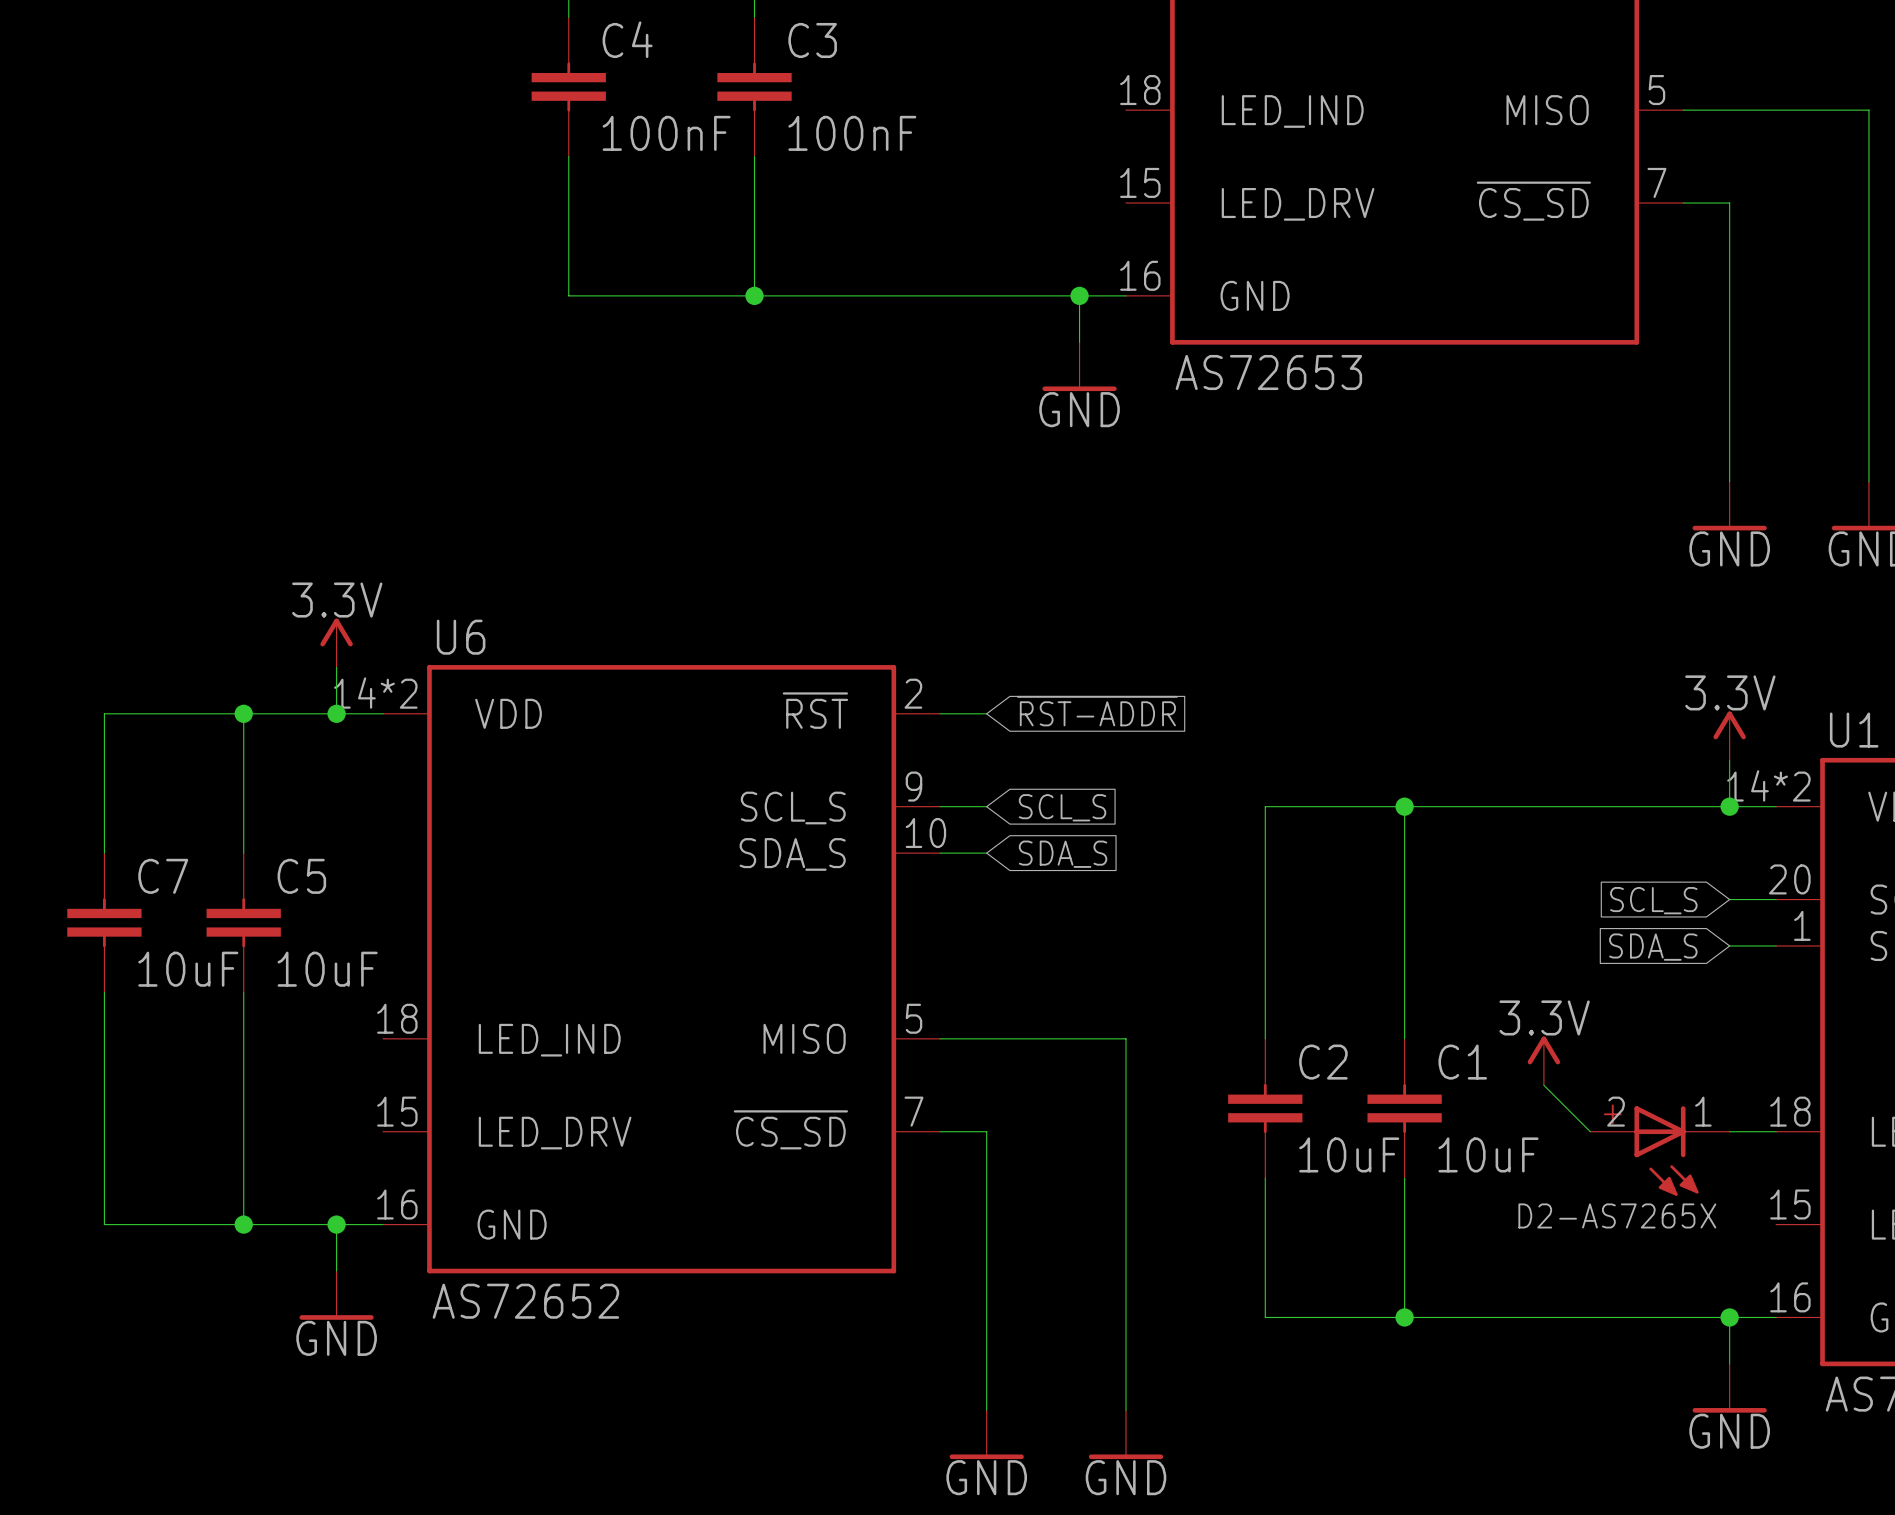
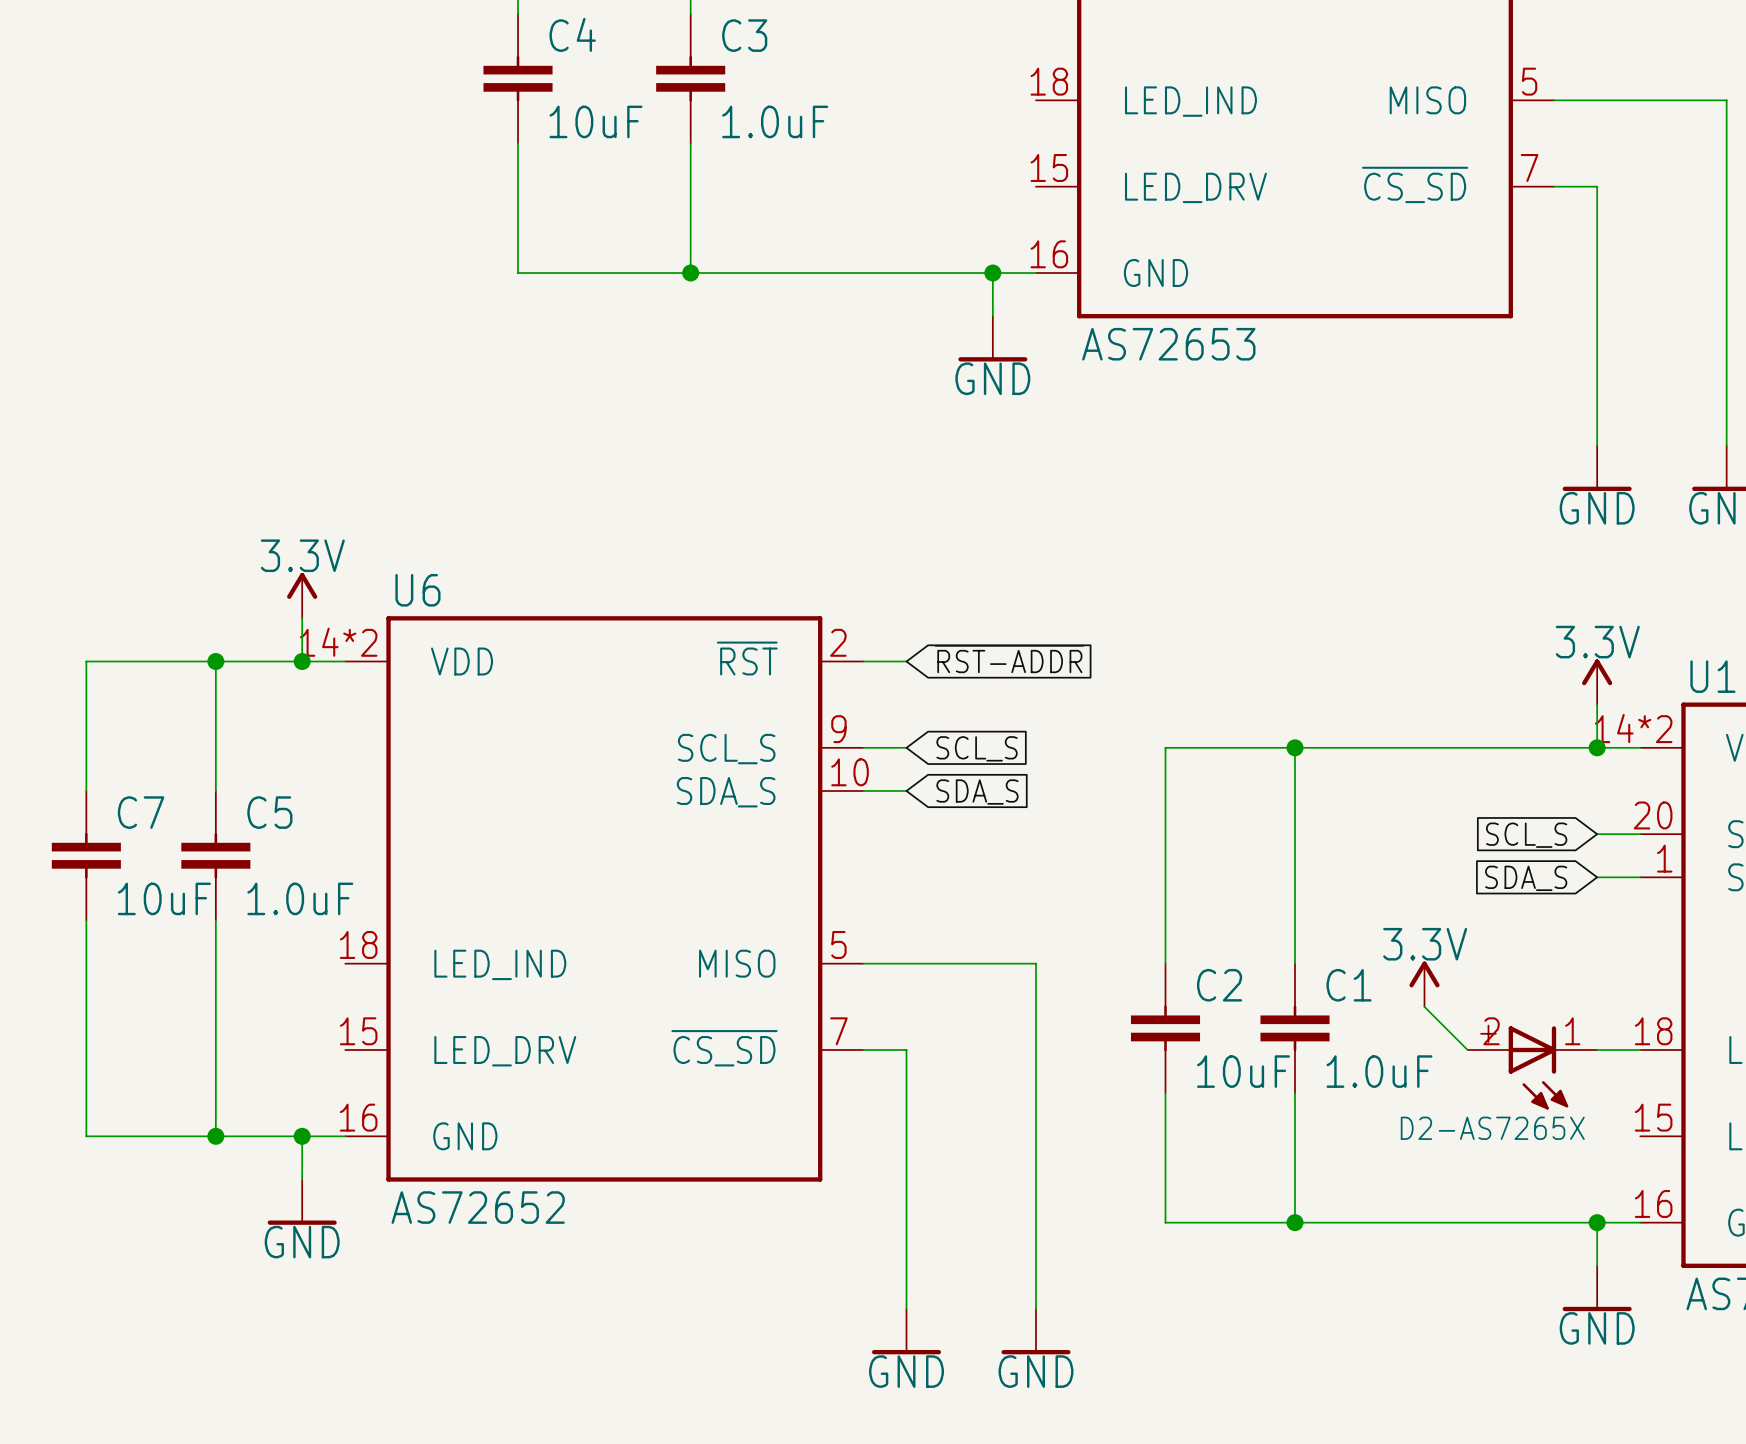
C4 value: 100nF (666, 133) -> 10uF (596, 121)
C3 value: 100nF (852, 133) -> 1.0uF (775, 121)
C5 value: 10uF (327, 969) -> 1.0uF (300, 898)
C1 value: 10uF (1488, 1154) -> 1.0uF (1379, 1071)

